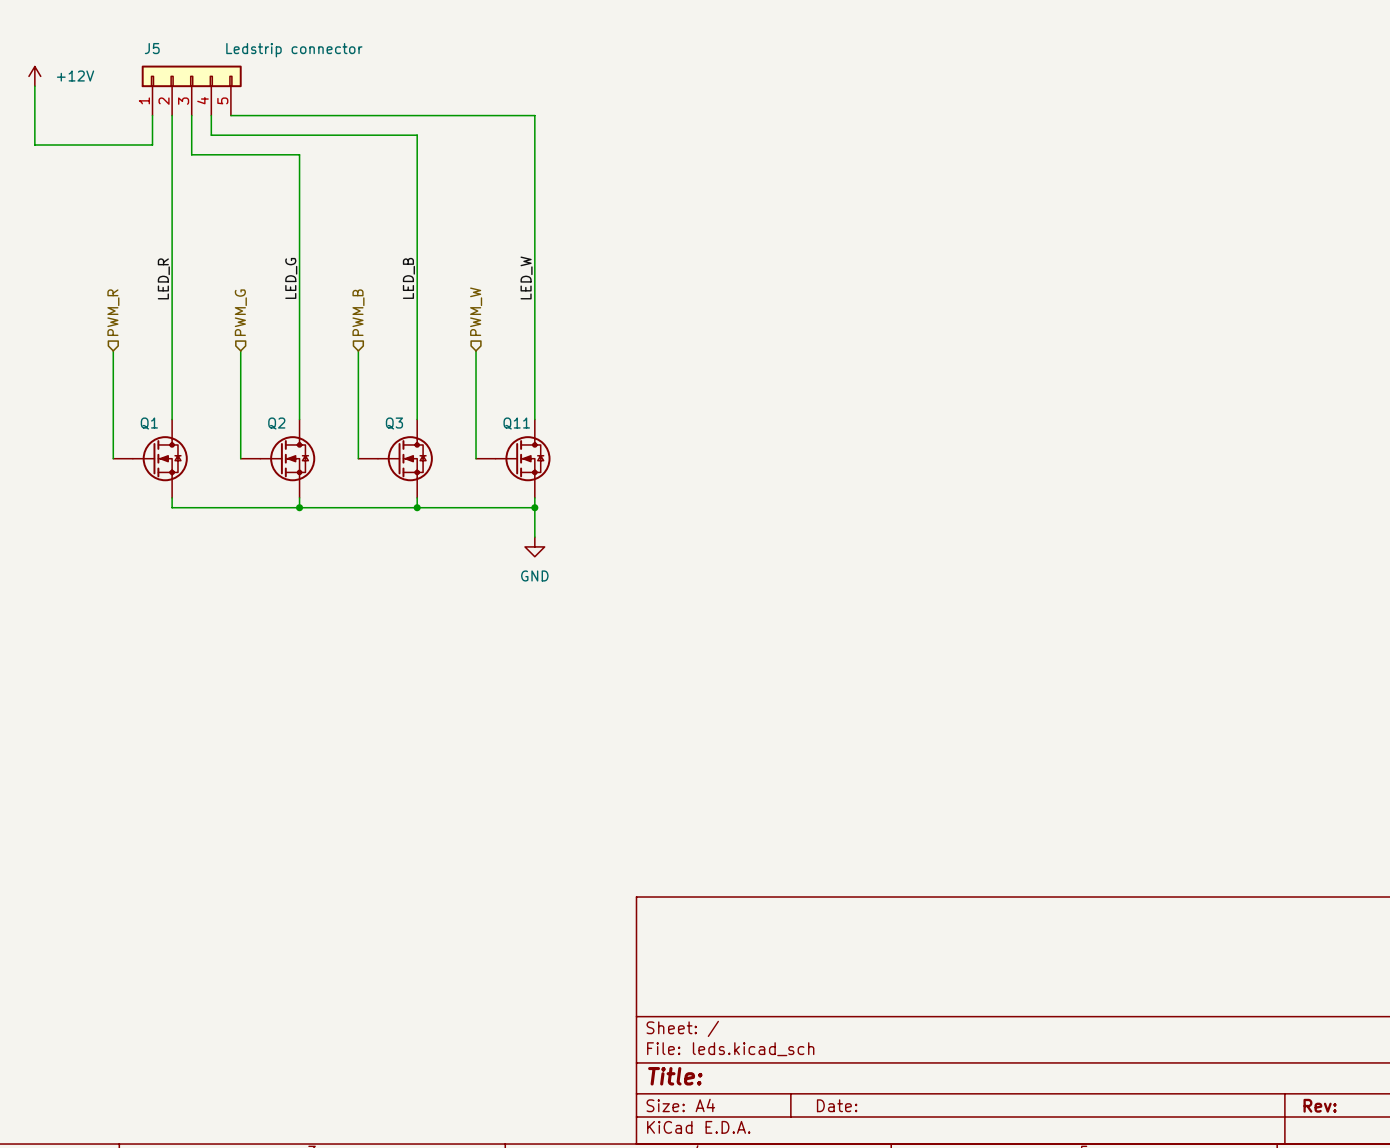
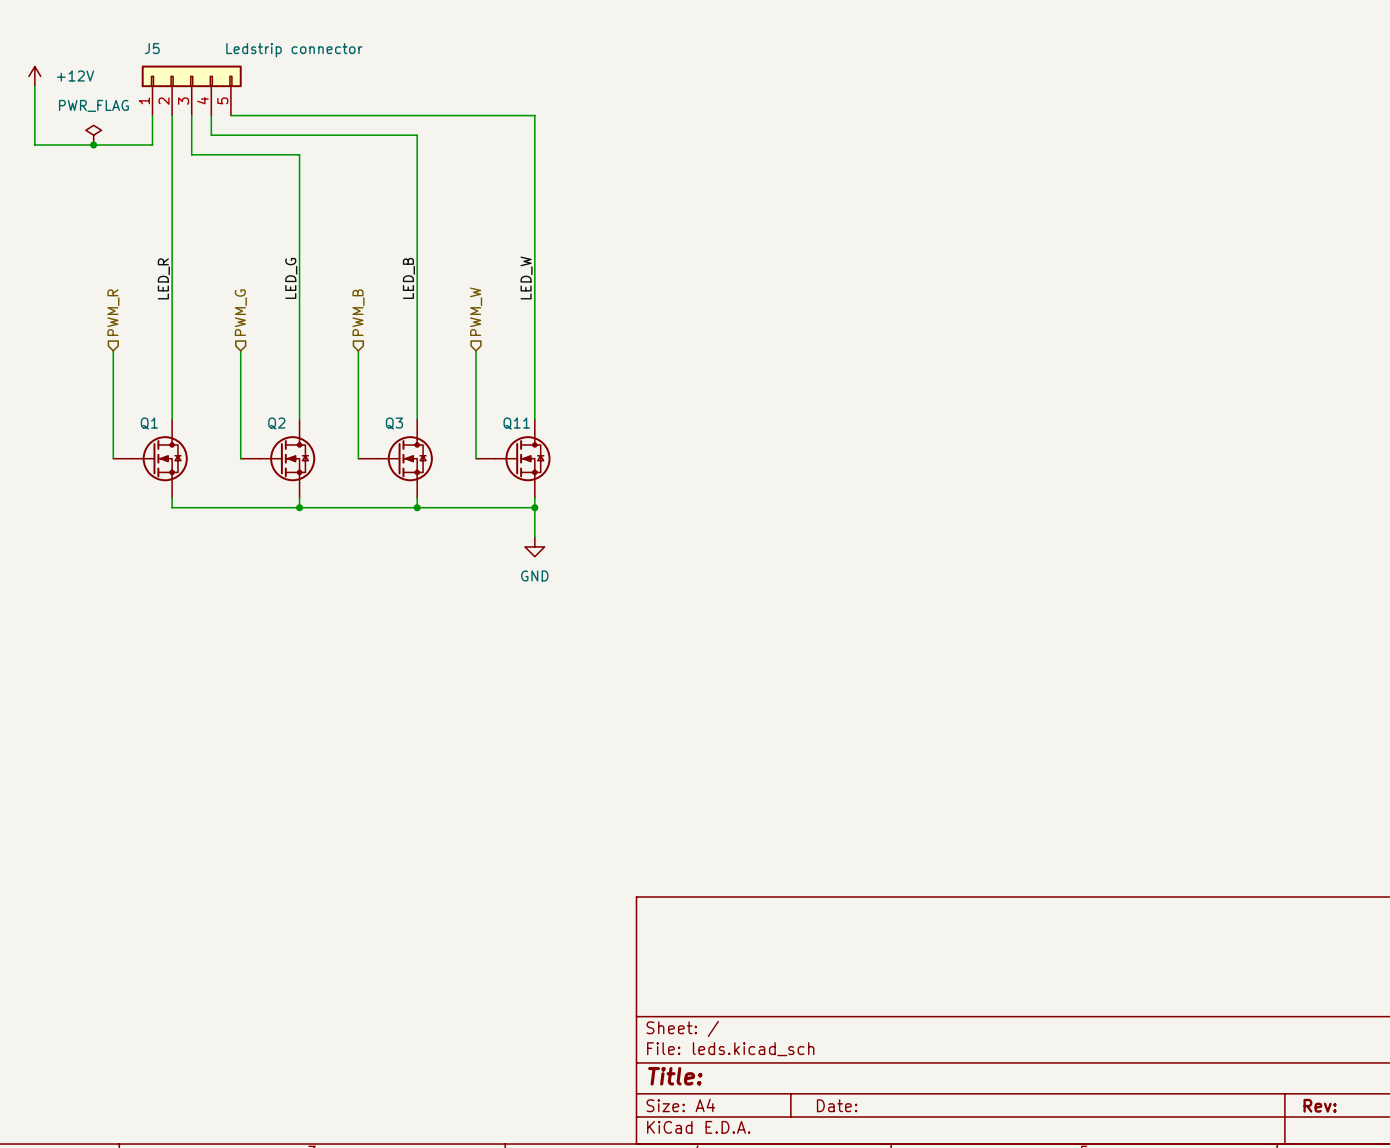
power symbol: none -> PWR_FLAG (93, 135)
junction: none -> (93, 145)

